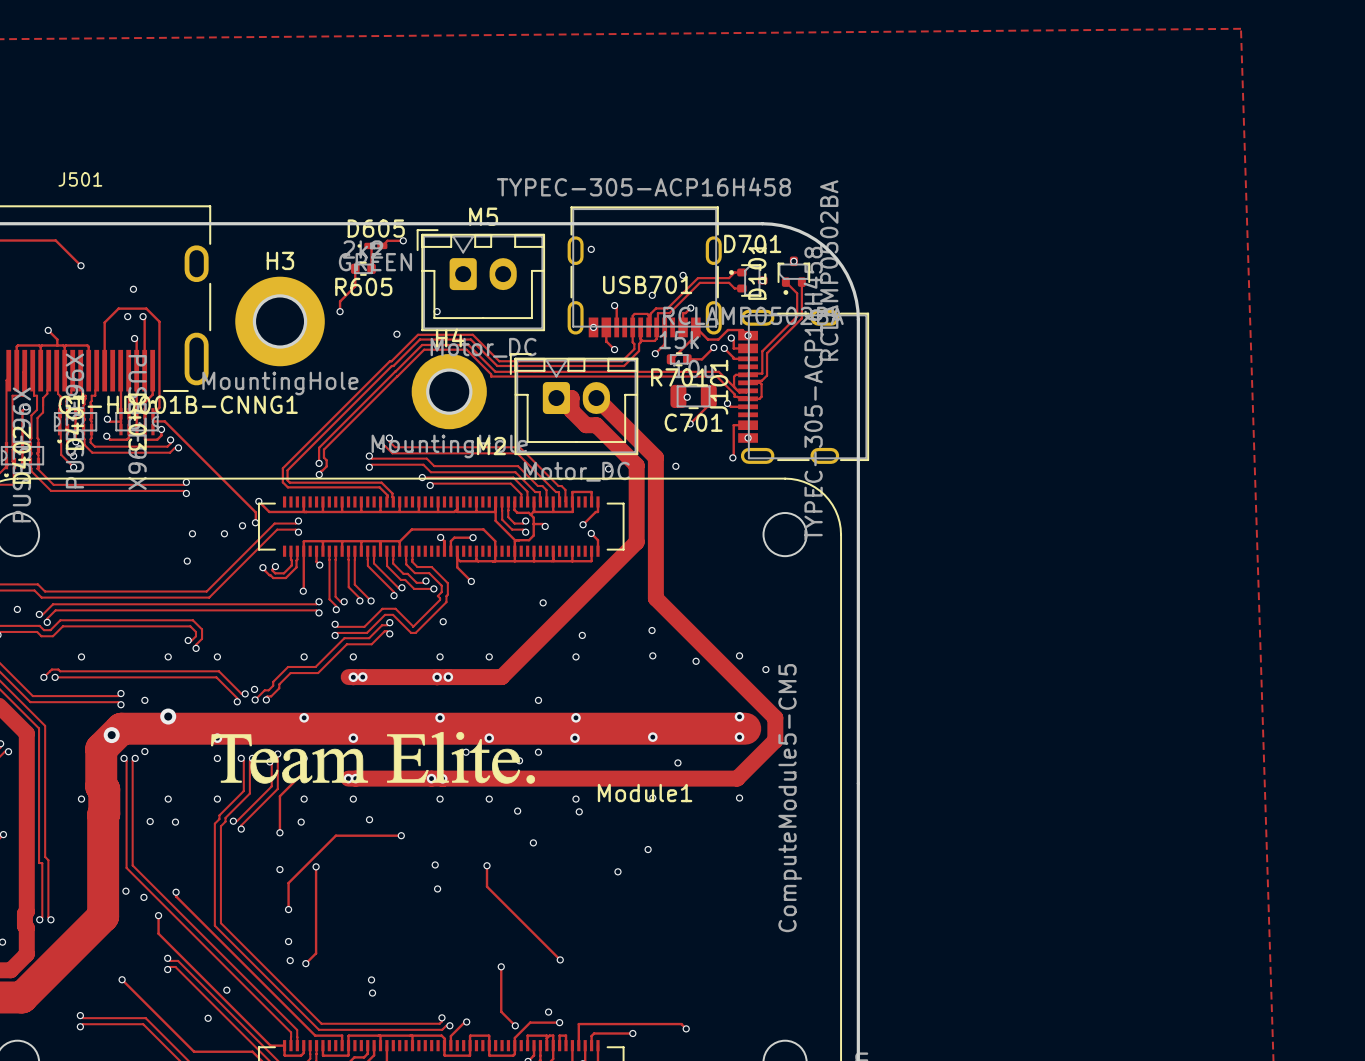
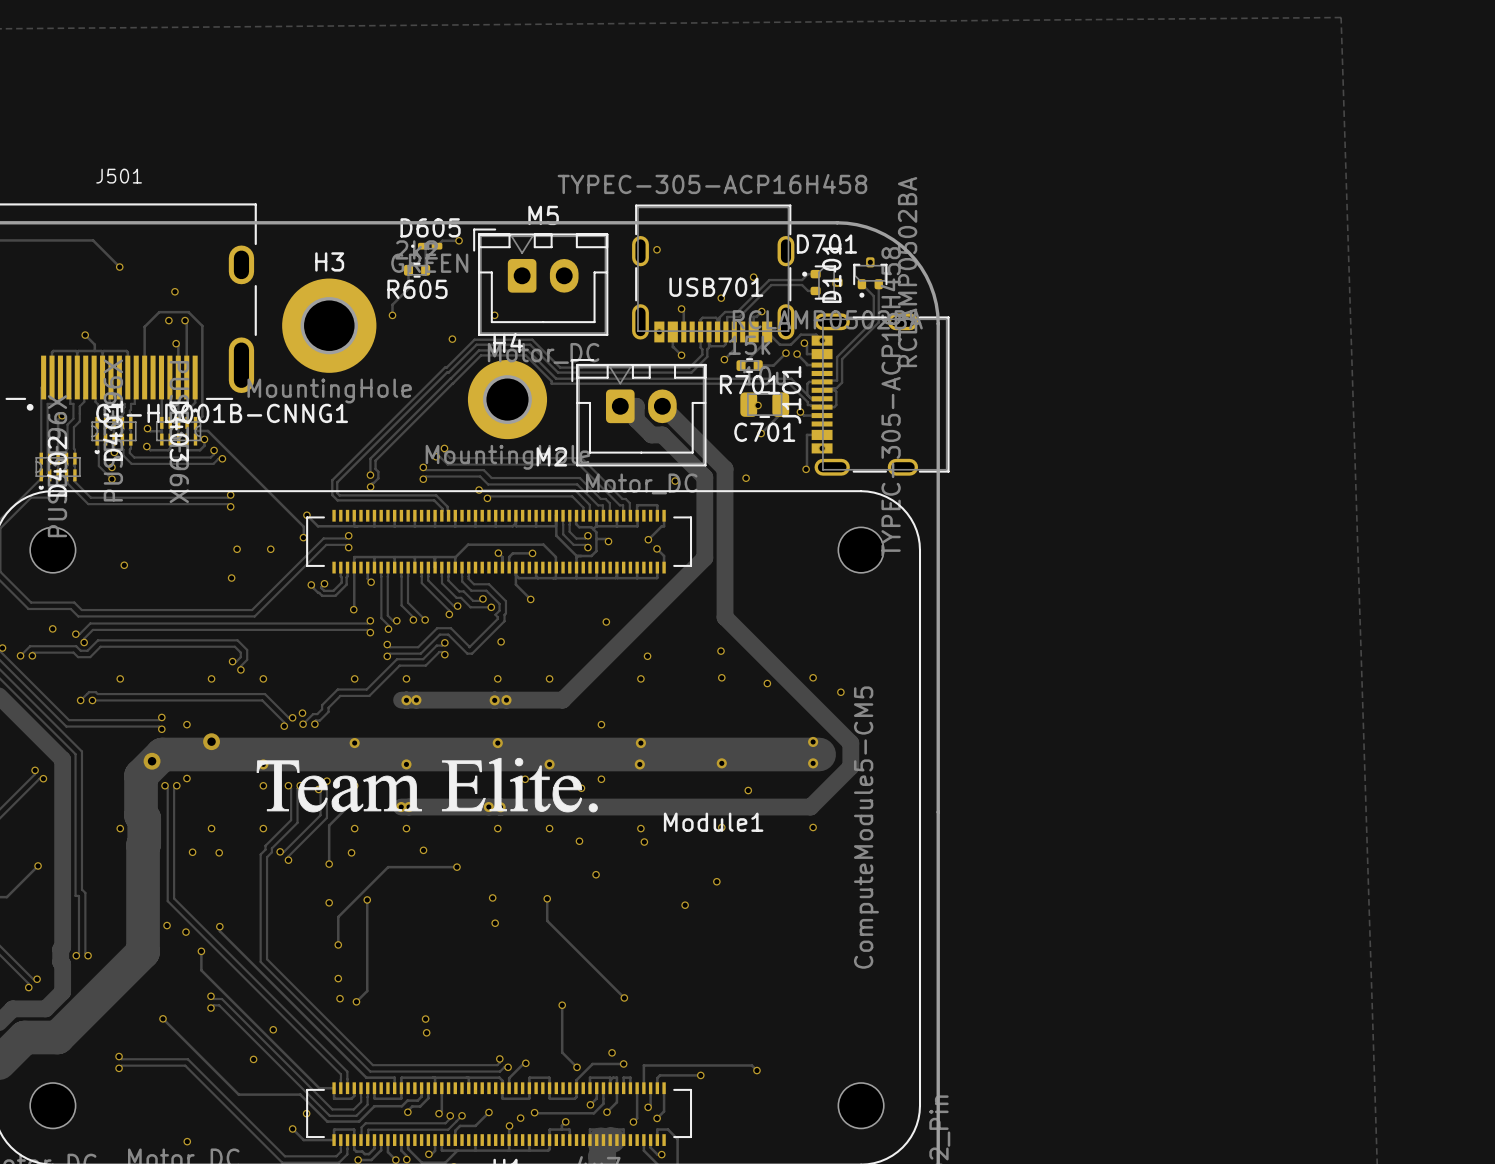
via: (242, 525) -> none
via: none -> (124, 565)

